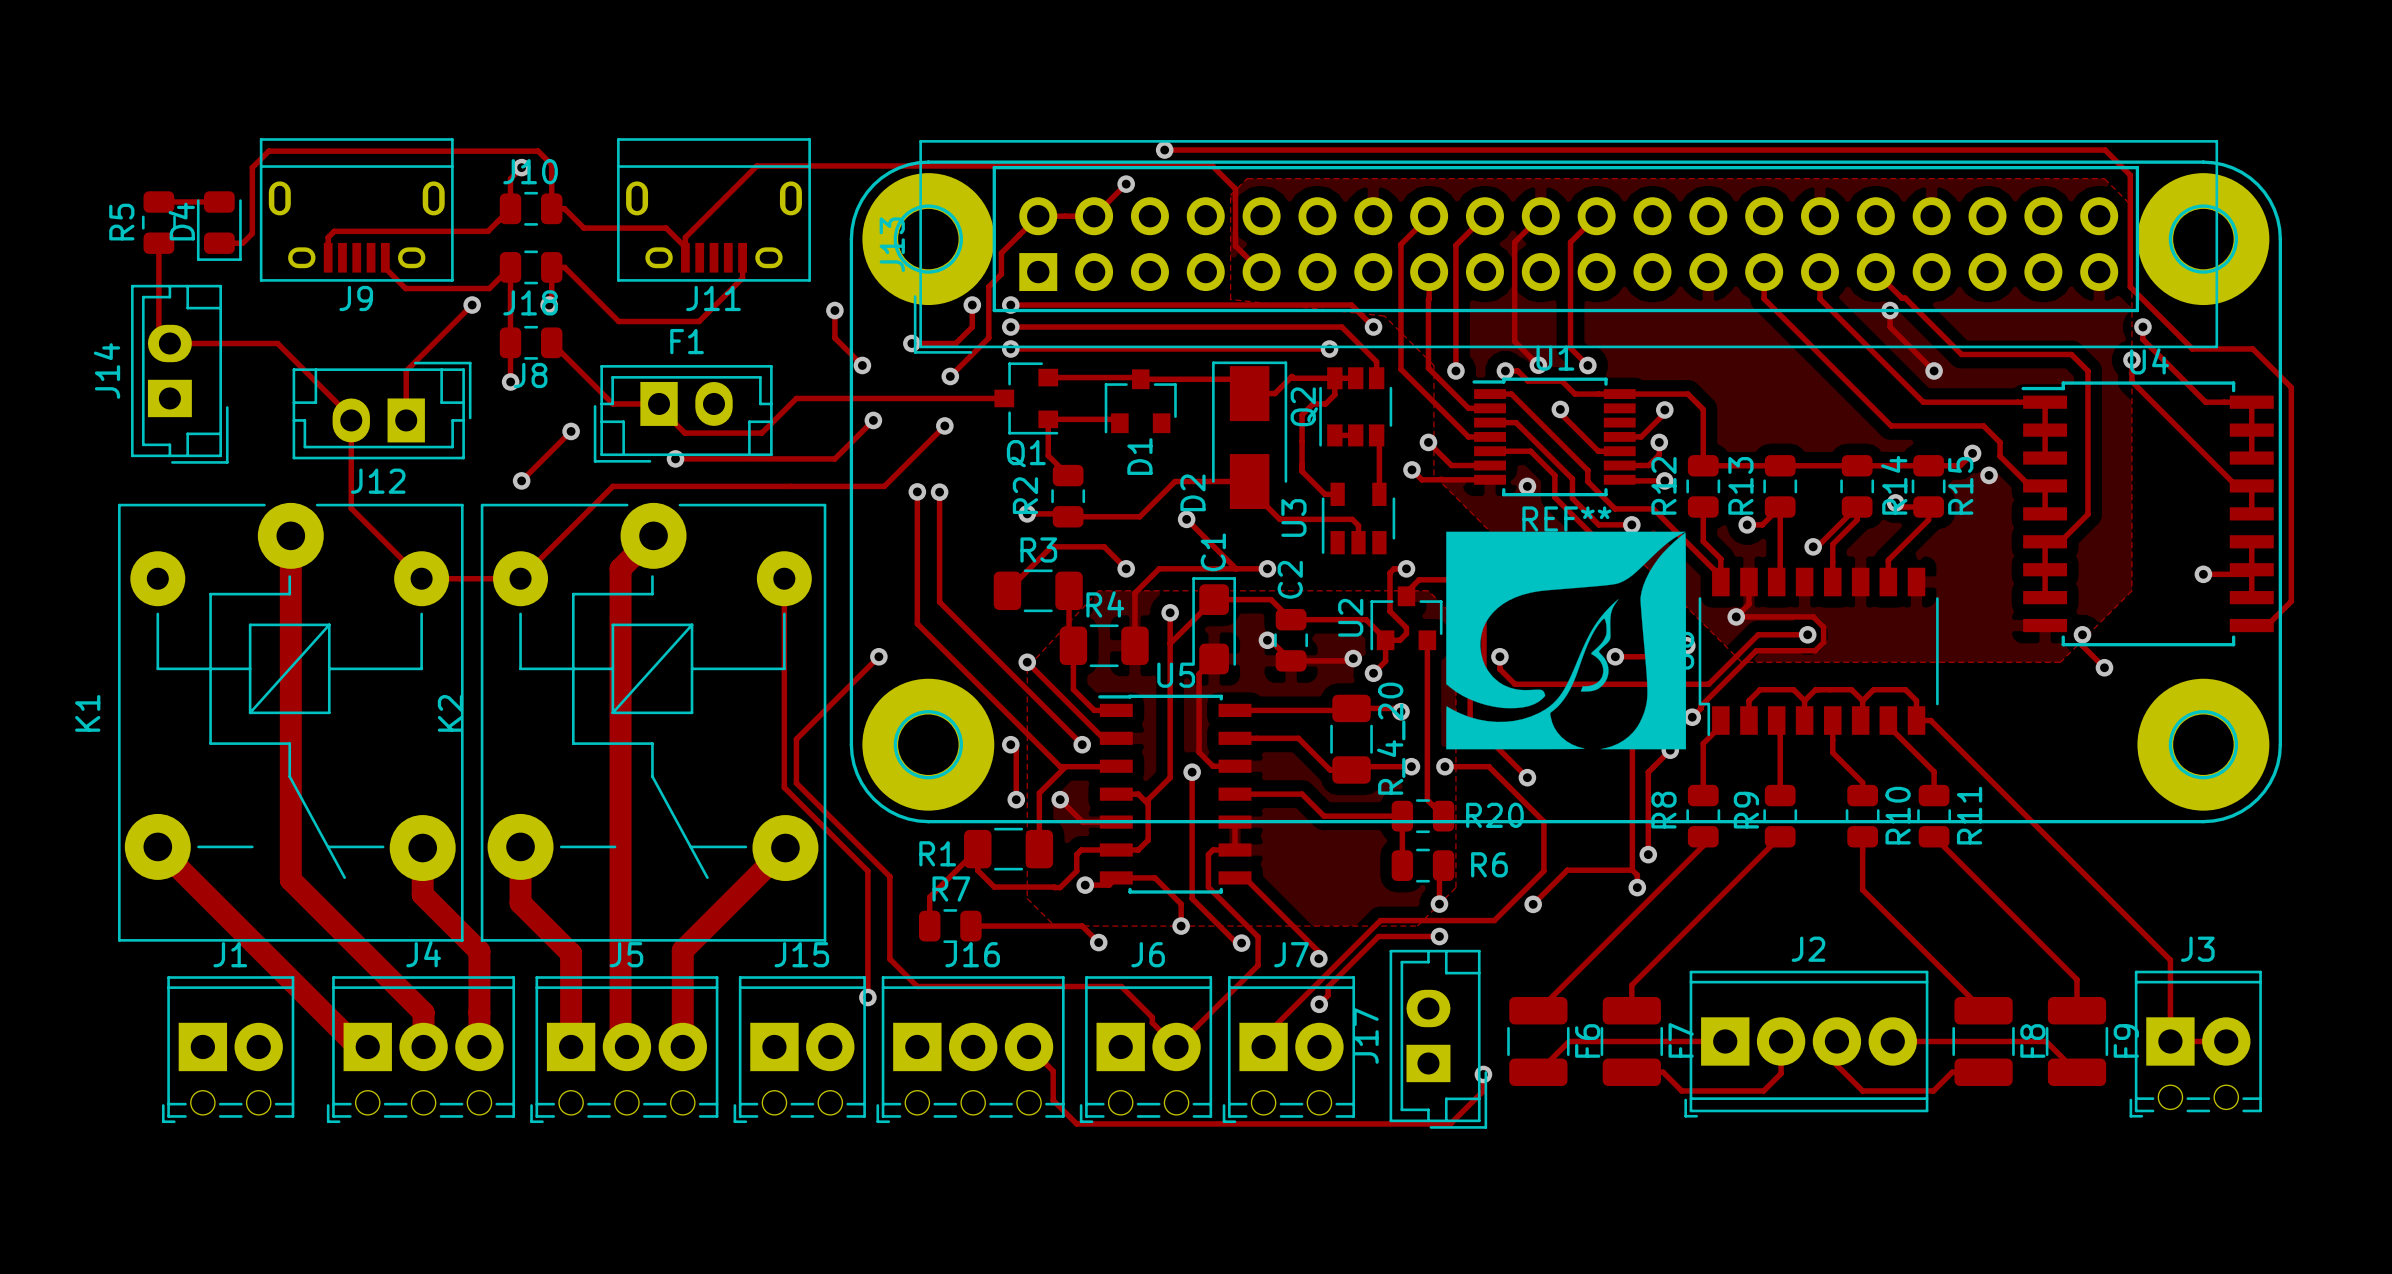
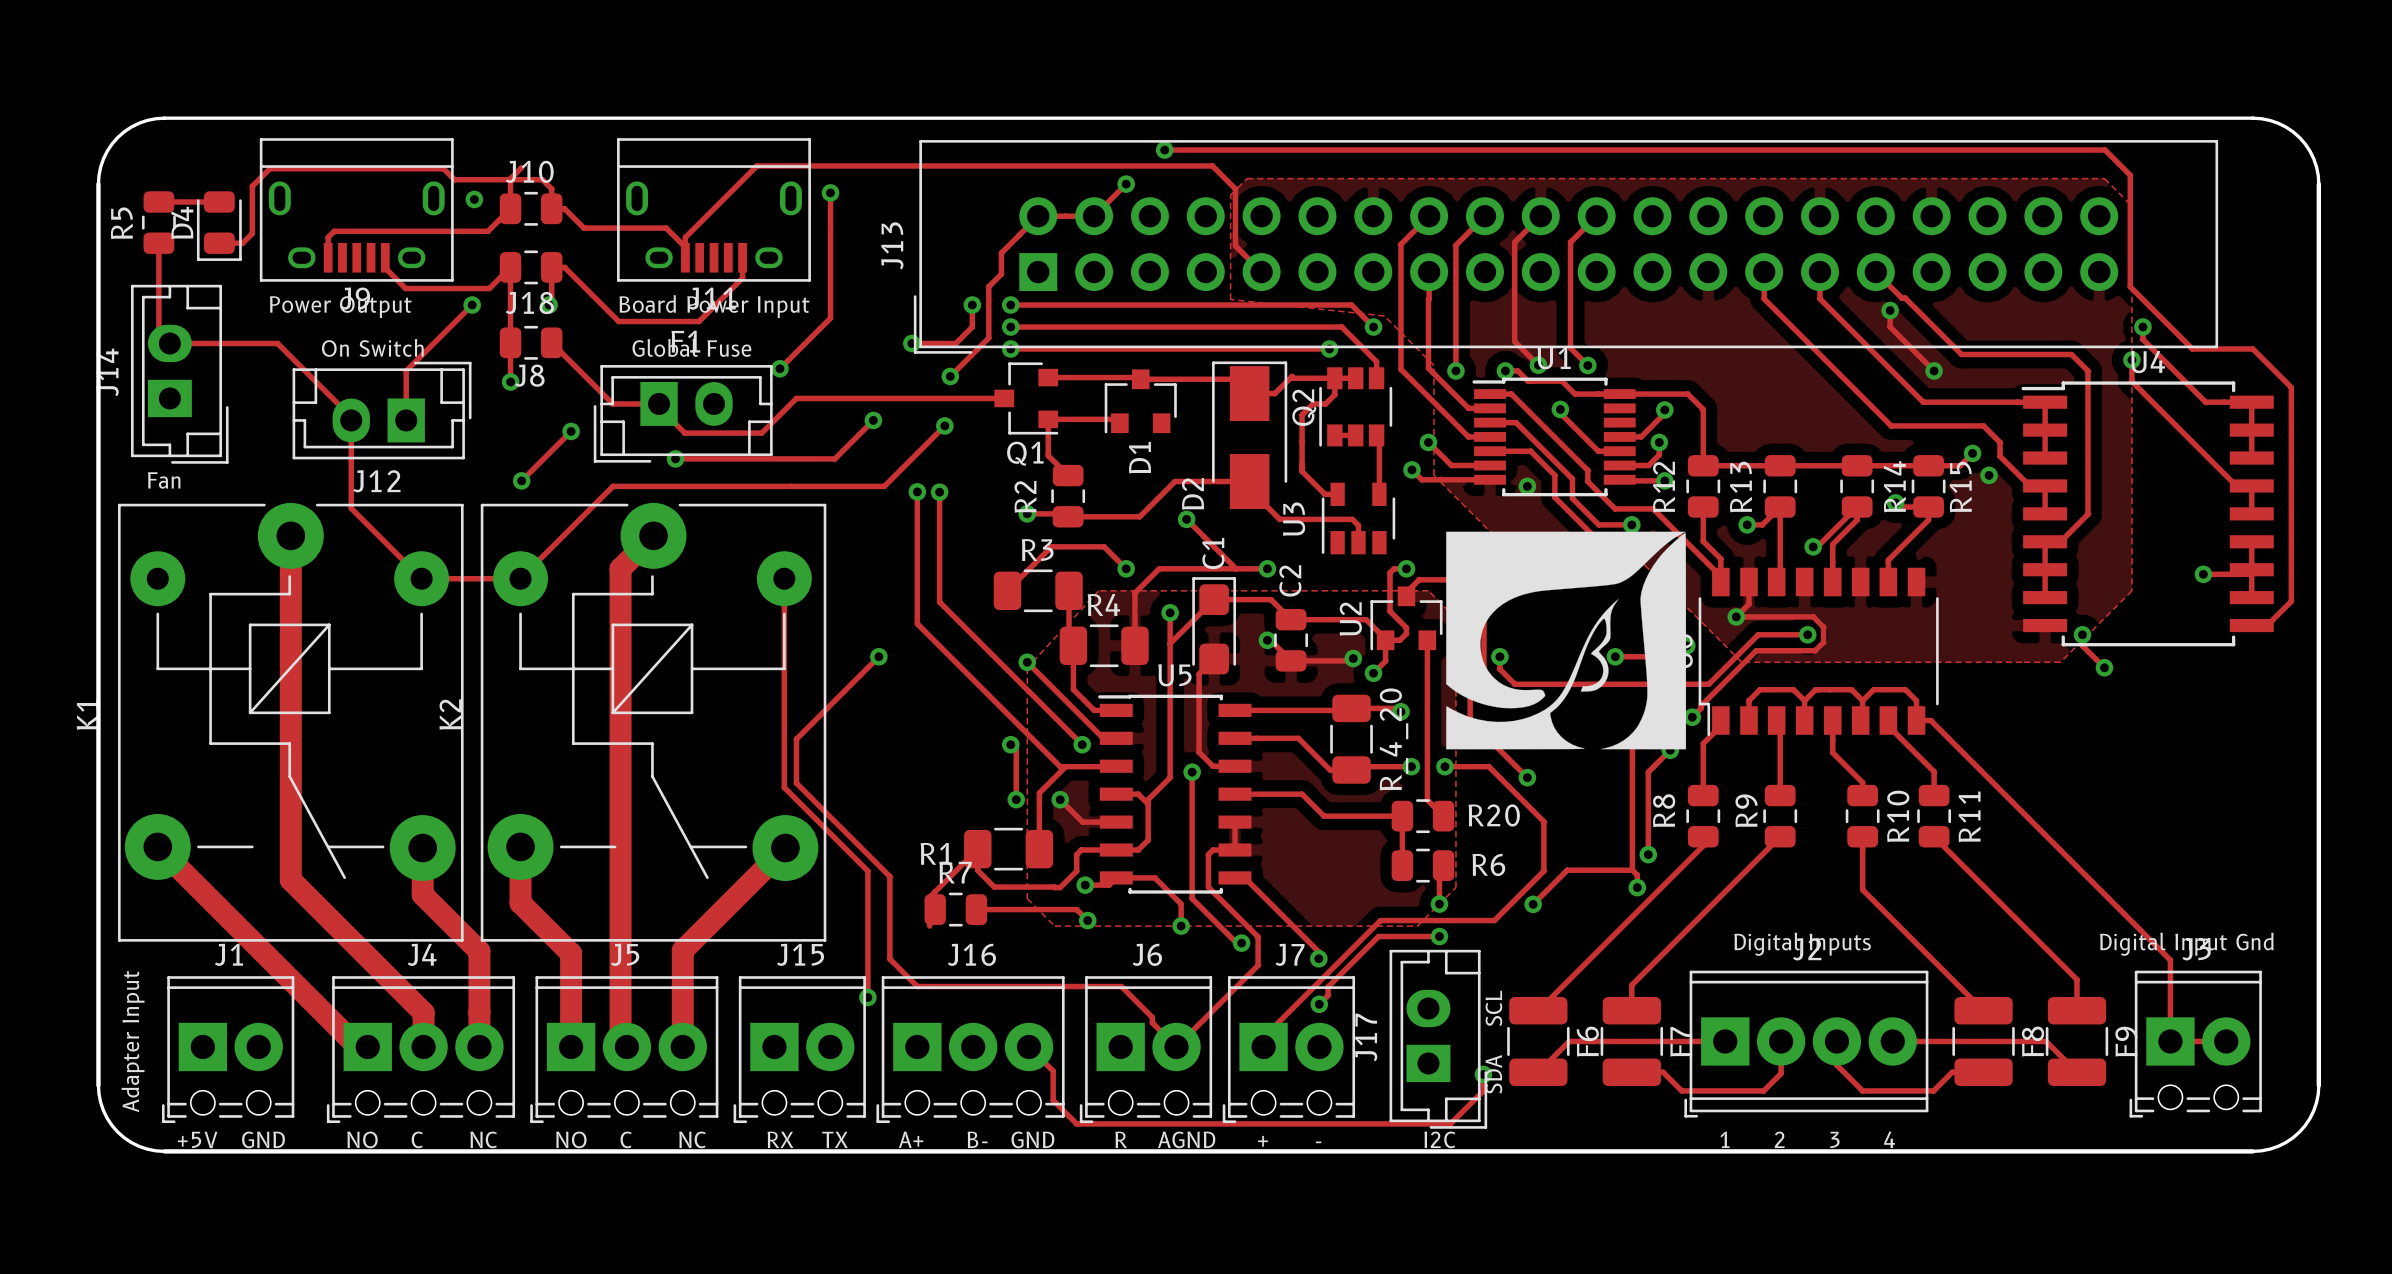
board edge: none -> (164, 118) (2252, 118) (2278, 123) (2293, 131) (2305, 143) (2313, 158) (2318, 184) (2318, 1085) (2313, 1110) (2305, 1125) (2293, 1137) (2278, 1146) (2252, 1151) (164, 1151) (139, 1146) (124, 1137) (107, 1118) (100, 1102) (98, 1085) (98, 184) (103, 158) (117, 137) (139, 123) (164, 118)
via position: (521, 167) -> (474, 199)
track: (252, 186) (252, 167) (268, 151) (538, 151) (551, 164) (551, 188) -> (252, 186) (269, 168) (443, 168) (454, 179) (542, 179) (551, 188)
track: none -> (830, 192) (830, 318) (779, 368)
via: none -> (830, 192)
text: none -> Power Output (340, 307)
text: none -> Board Power Input (714, 306)
track: (834, 310) (834, 338) (862, 365) -> none
via: (834, 310) -> none
text: none -> On Switch (372, 347)
text: none -> Global Fuse (691, 347)
via: (862, 365) -> none
via: none -> (779, 368)
text: none -> Fan (164, 480)
REF**: (1565, 491) -> none
track: none -> (976, 909) (1076, 909) (1087, 920)
R7 position: (950, 926) -> (955, 909)
track: (970, 926) (1082, 926) (1098, 942) -> none
via position: (1098, 942) -> (1087, 920)
text: none -> Digital Inputs (1802, 944)
text: none -> Digital Input Gnd (2186, 944)
text: none -> SCL (1493, 1008)
text: none -> Adapter Input (132, 1041)
text: none -> SDA (1493, 1074)
text: none -> +5V (197, 1139)
text: none -> GND (263, 1139)
text: none -> NO (362, 1139)
text: none -> C (417, 1139)
text: none -> NC (483, 1139)
text: none -> NO (571, 1139)
text: none -> C (626, 1139)
text: none -> NC (692, 1139)
text: none -> RX (780, 1139)
text: none -> TX (834, 1139)
text: none -> A+ (911, 1139)
text: none -> B- (977, 1139)
text: none -> GND (1032, 1139)
text: none -> R (1121, 1139)
text: none -> AGND (1186, 1139)
text: none -> I2C (1439, 1139)
text: none -> 1 (1724, 1139)
text: none -> 2 (1779, 1139)
text: none -> 3 (1834, 1139)
text: none -> 4 (1889, 1139)
text: none -> + (1263, 1141)
text: none -> - (1318, 1142)

